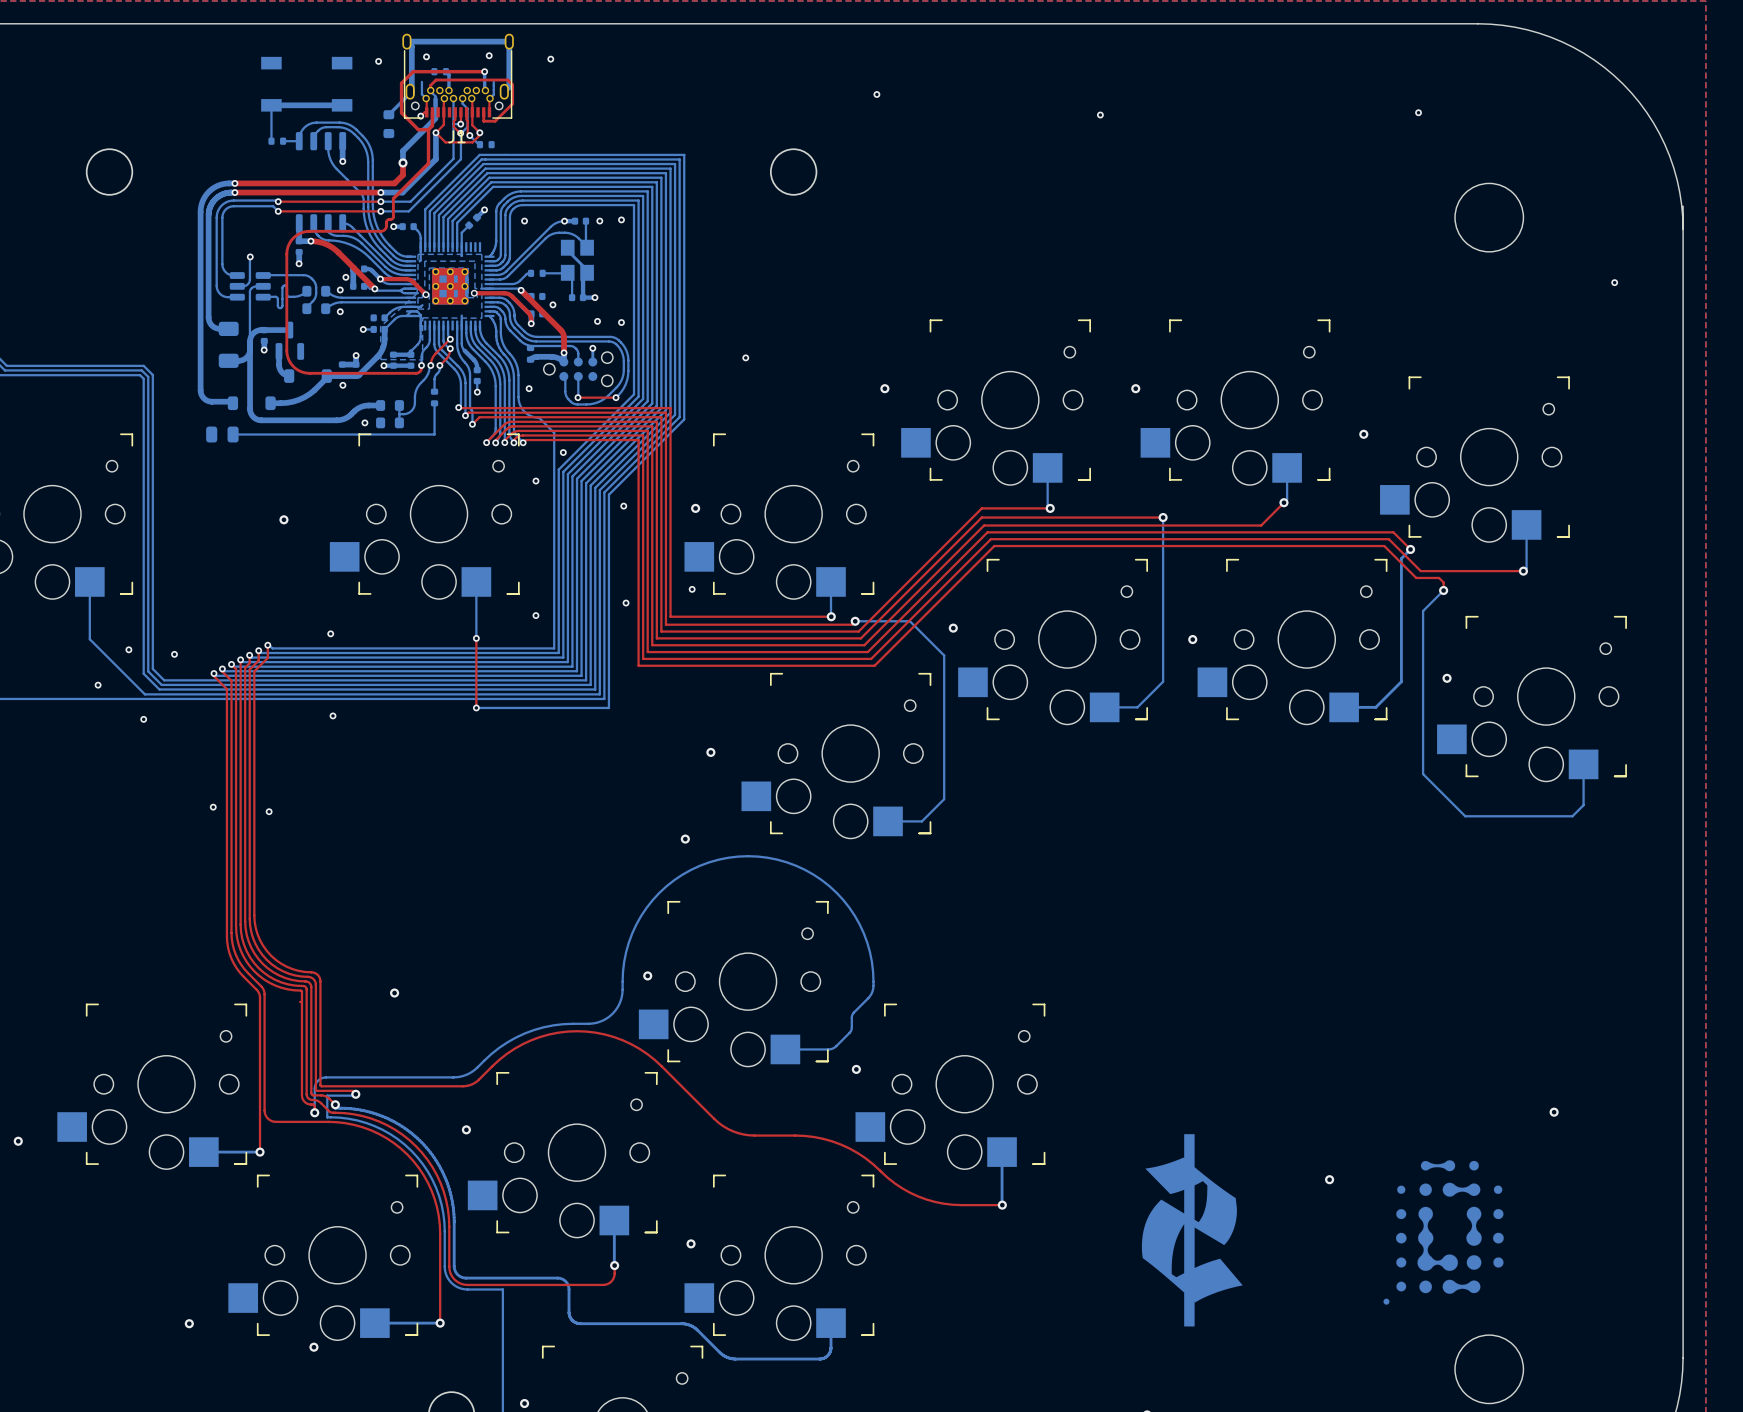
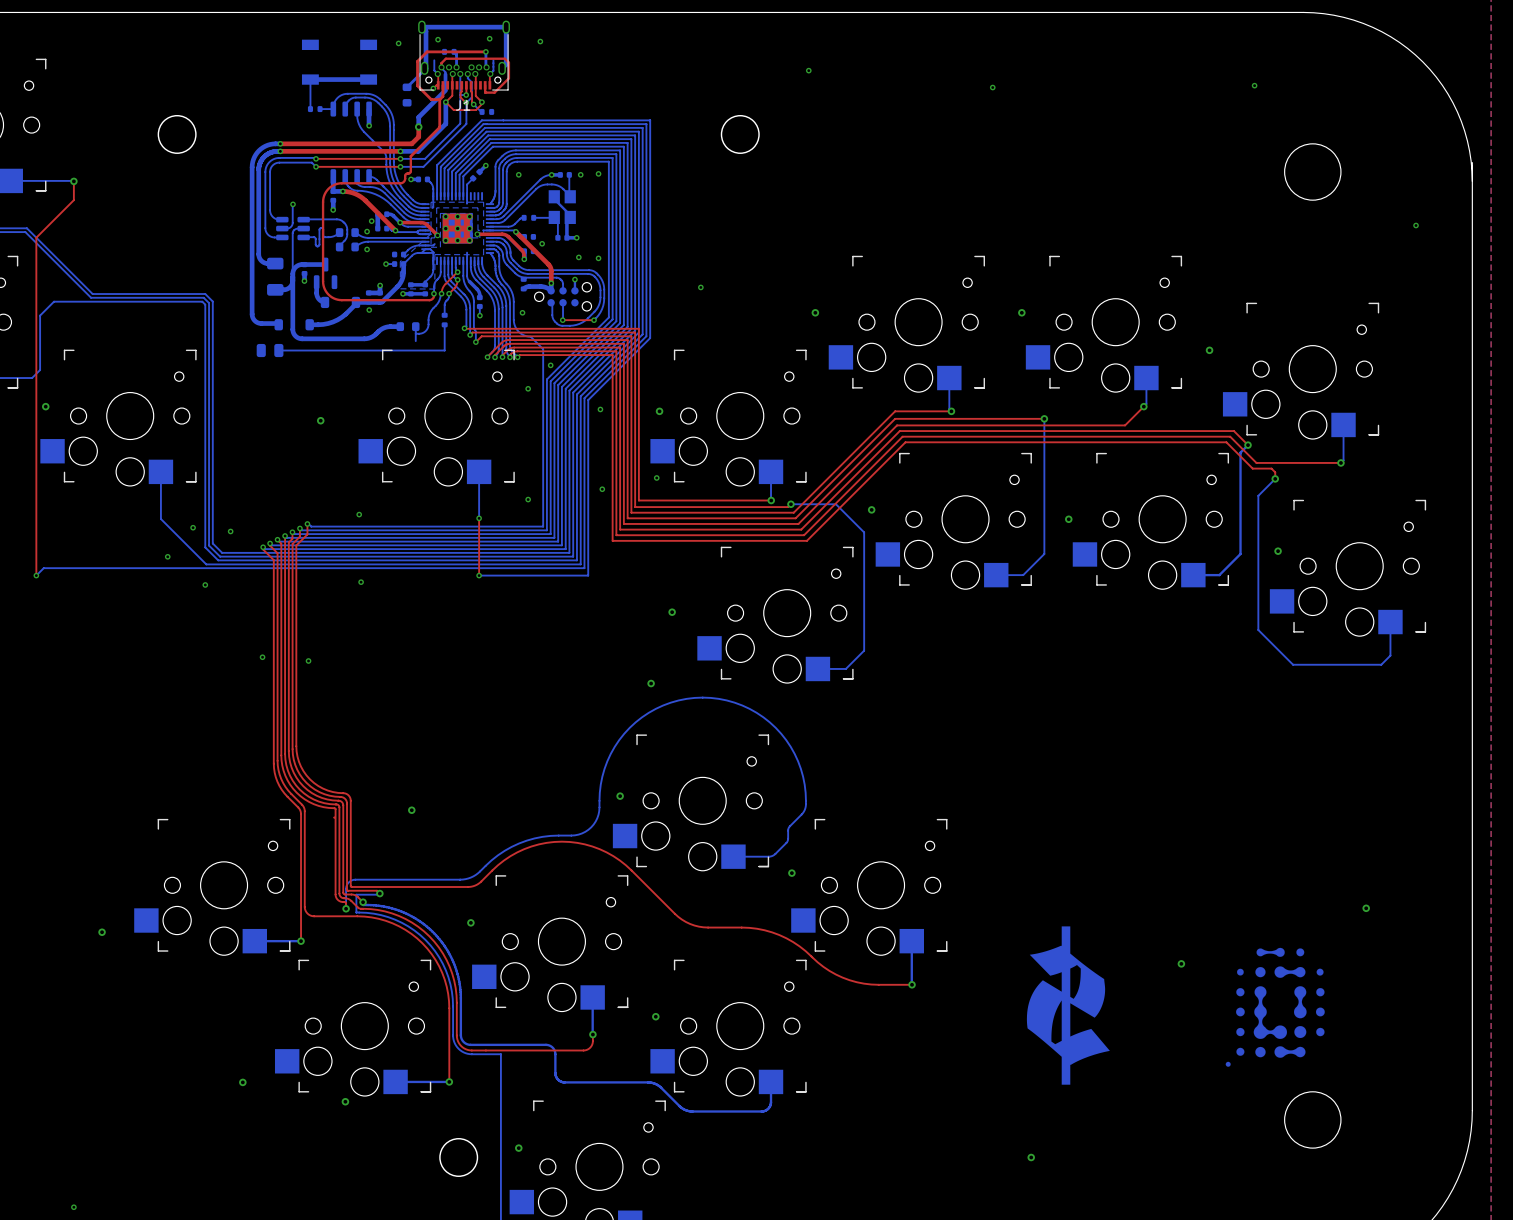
via: (364, 422) -> none
part: (390, 422) -> none

